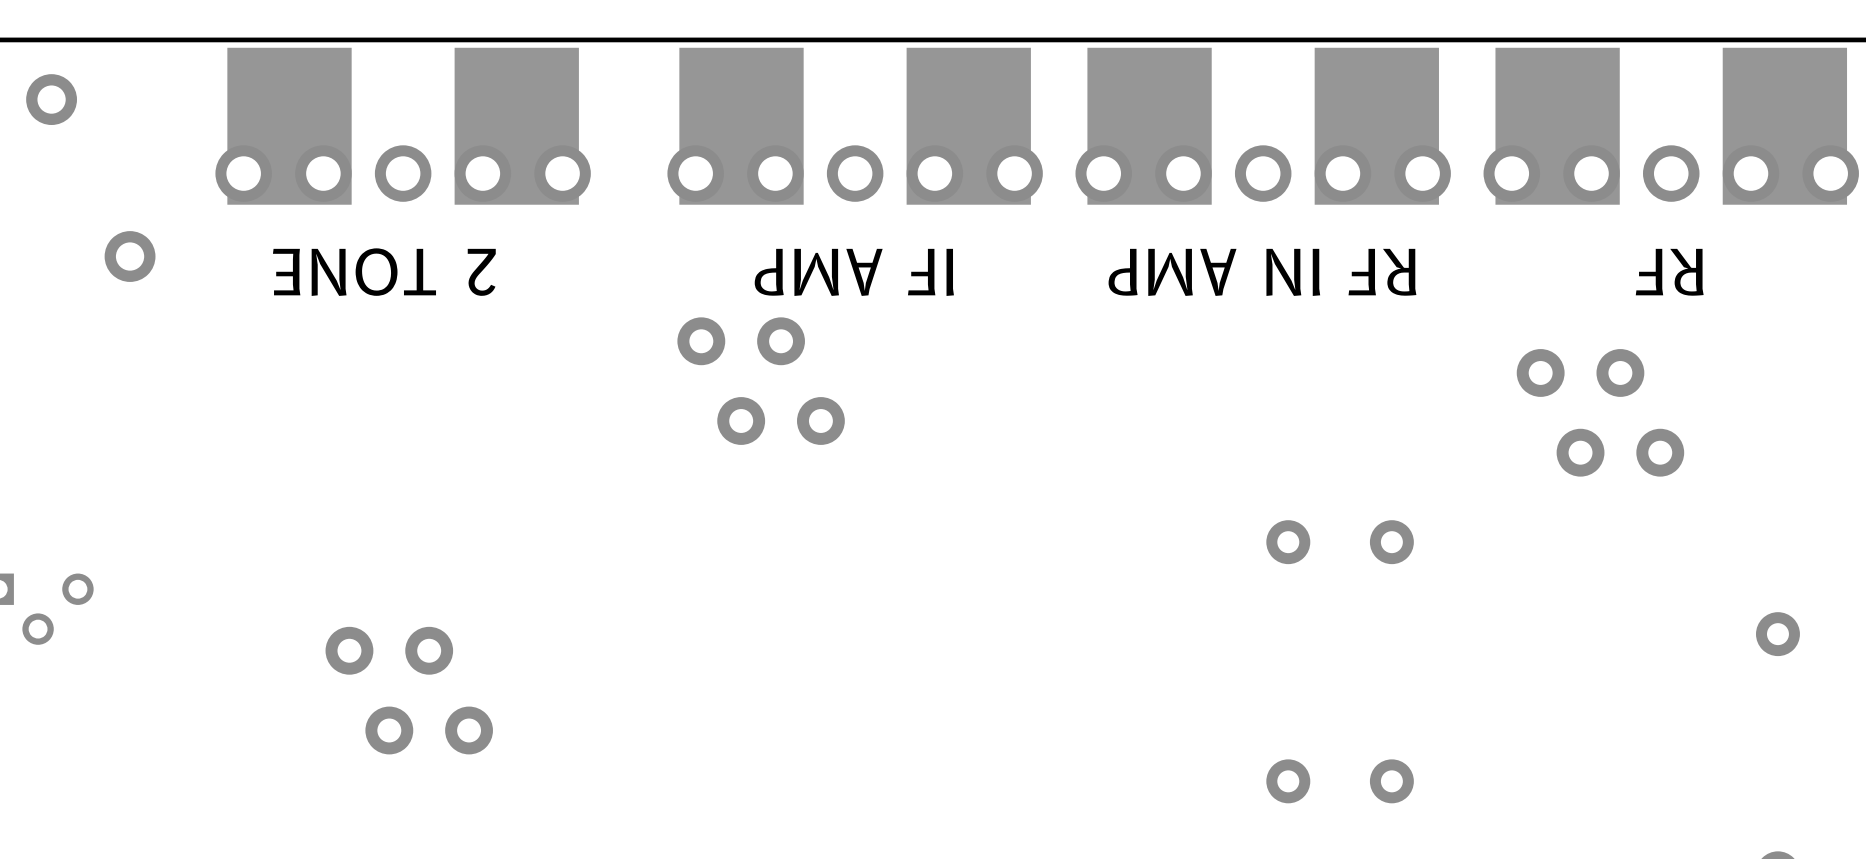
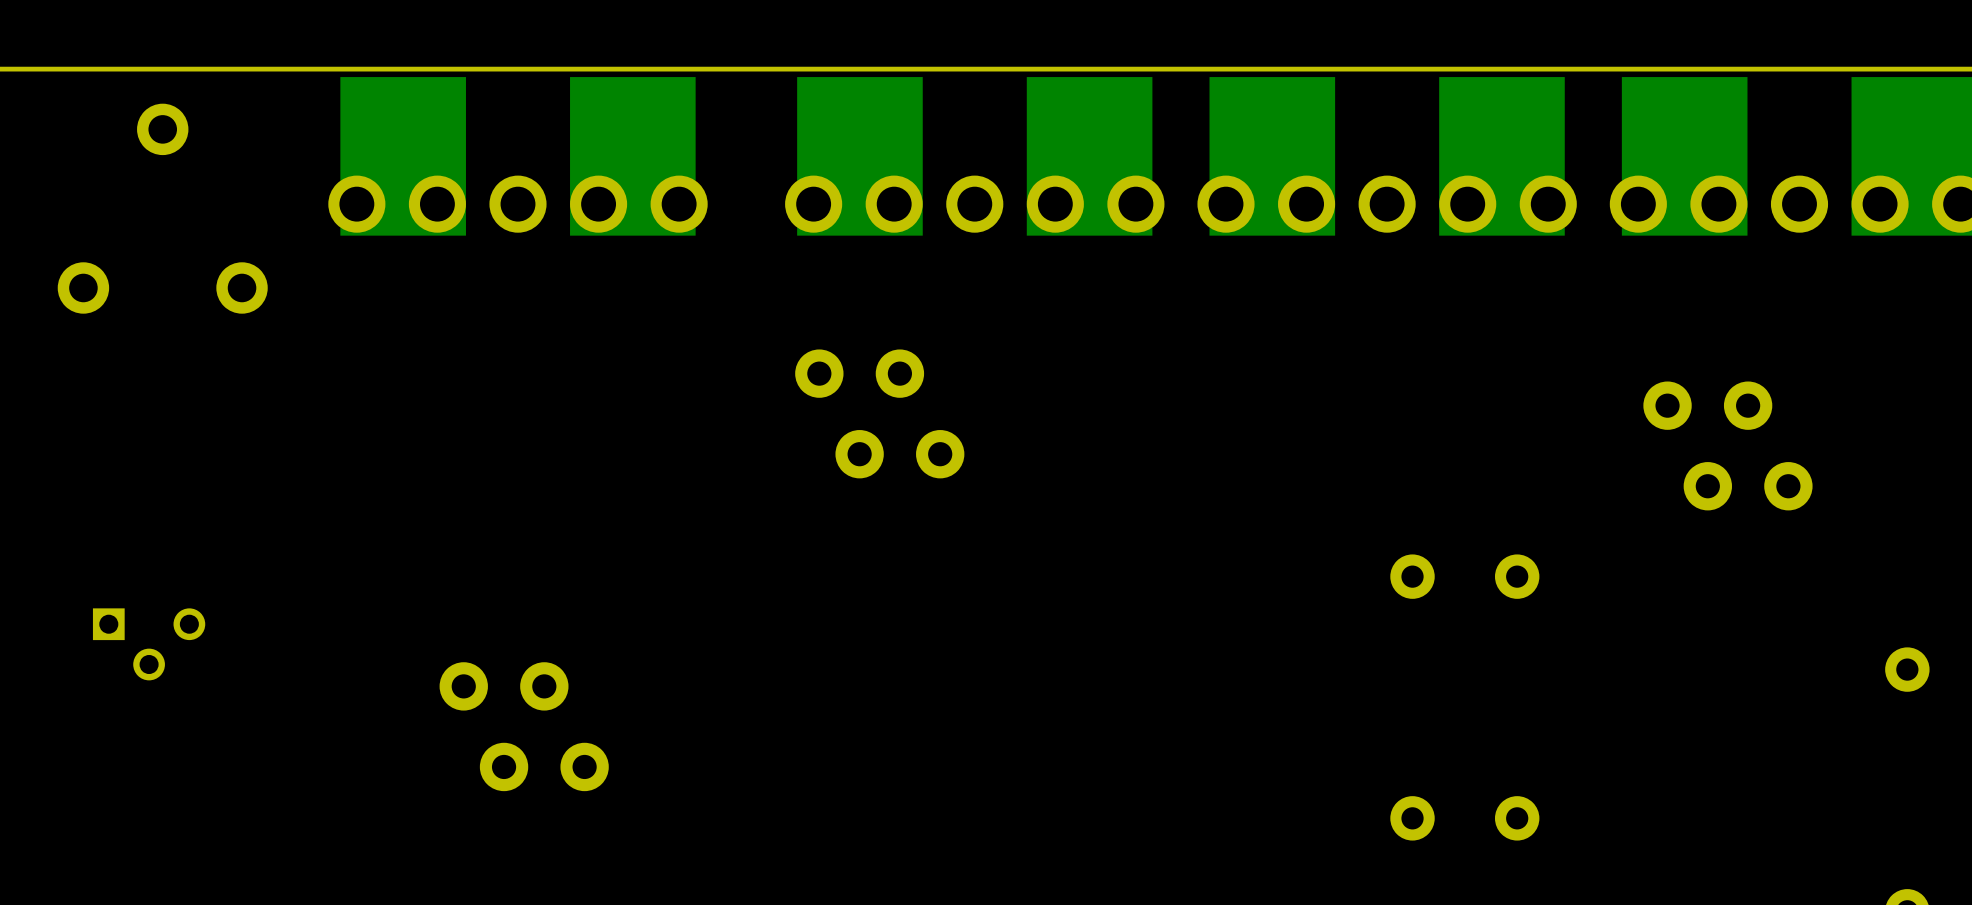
text: 2 TONE (384, 272) -> none
text: IF AMP (854, 272) -> none
text: RF IN AMP (1262, 272) -> none
text: RF (1669, 272) -> none

